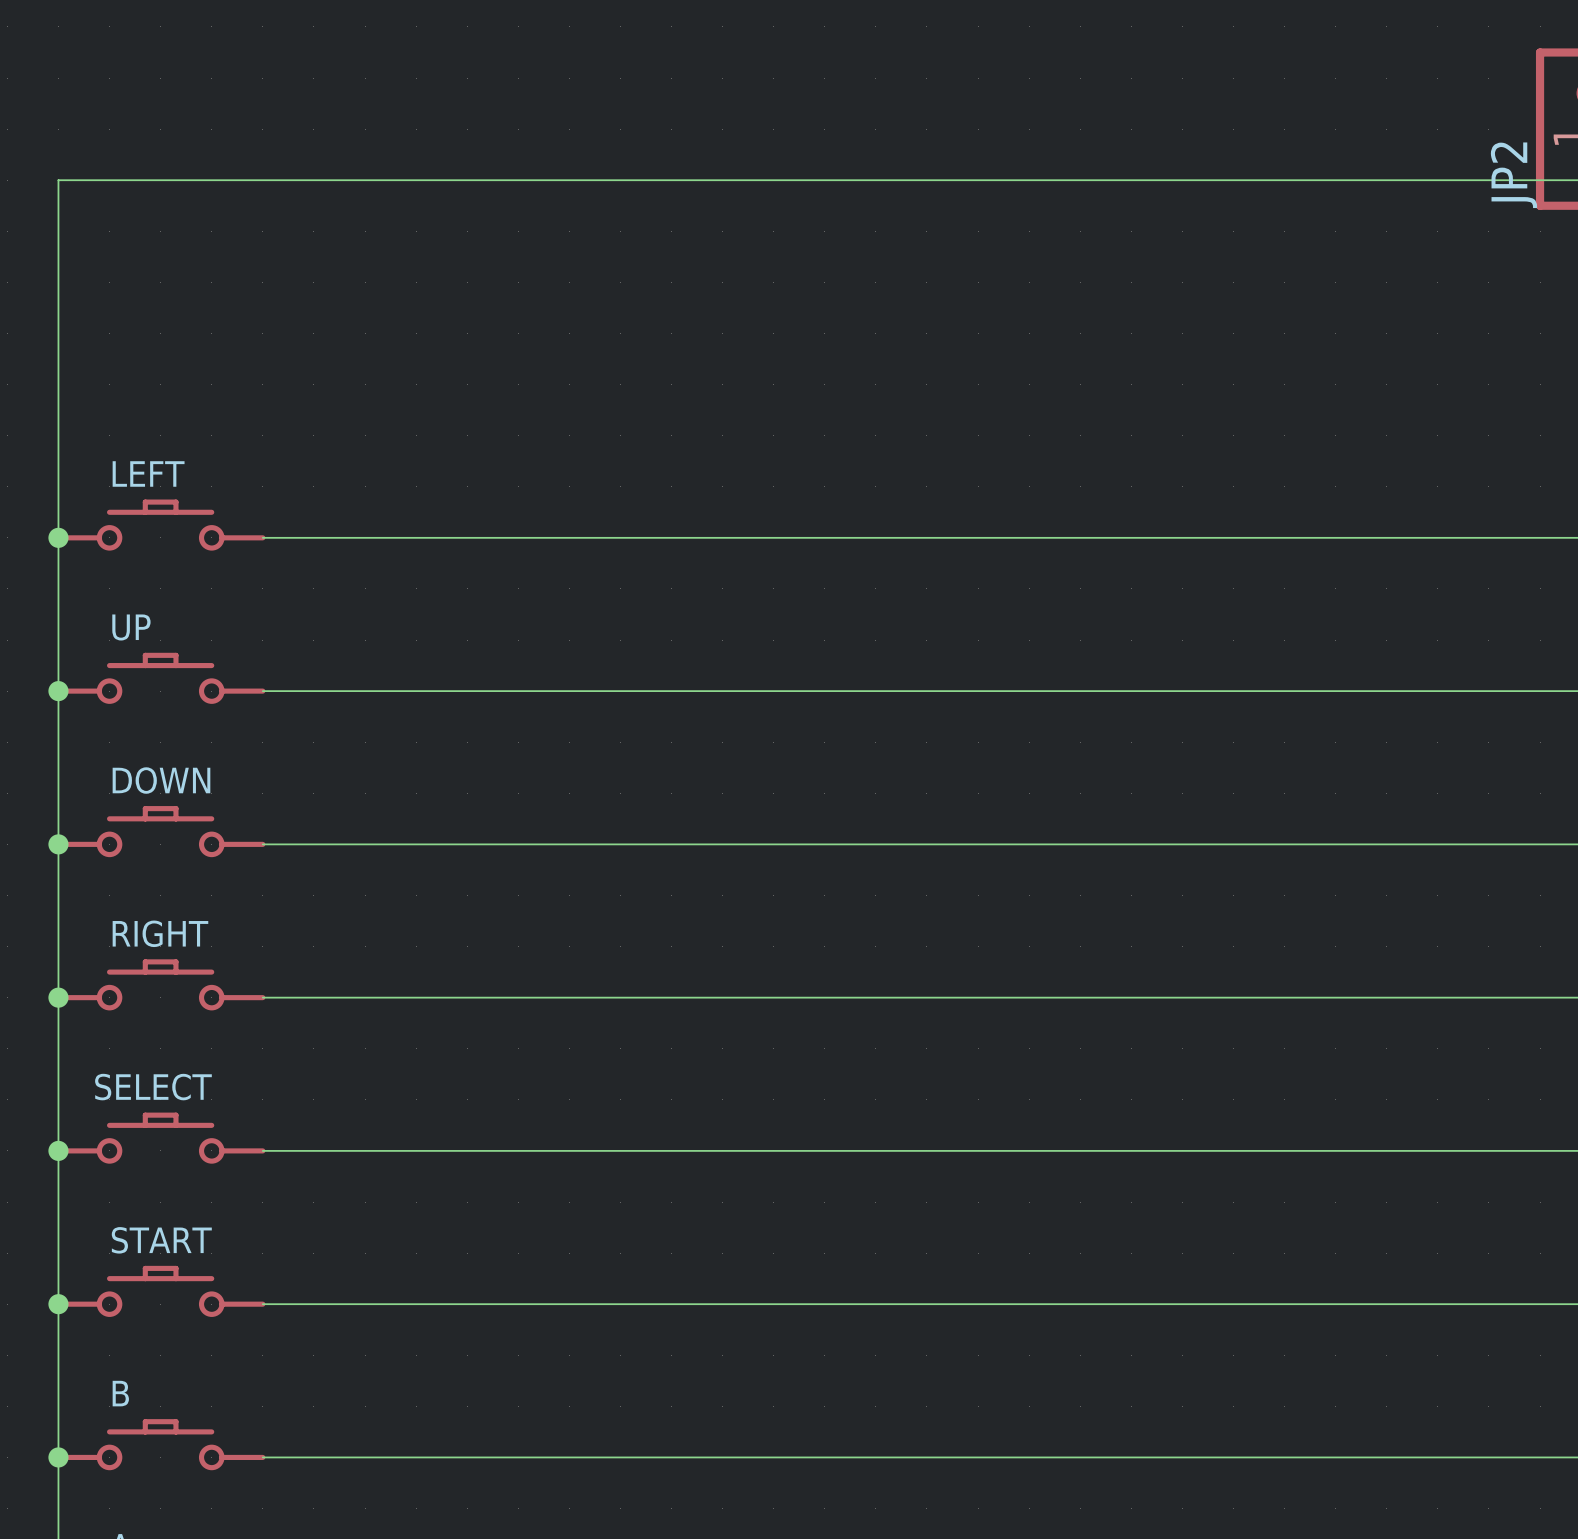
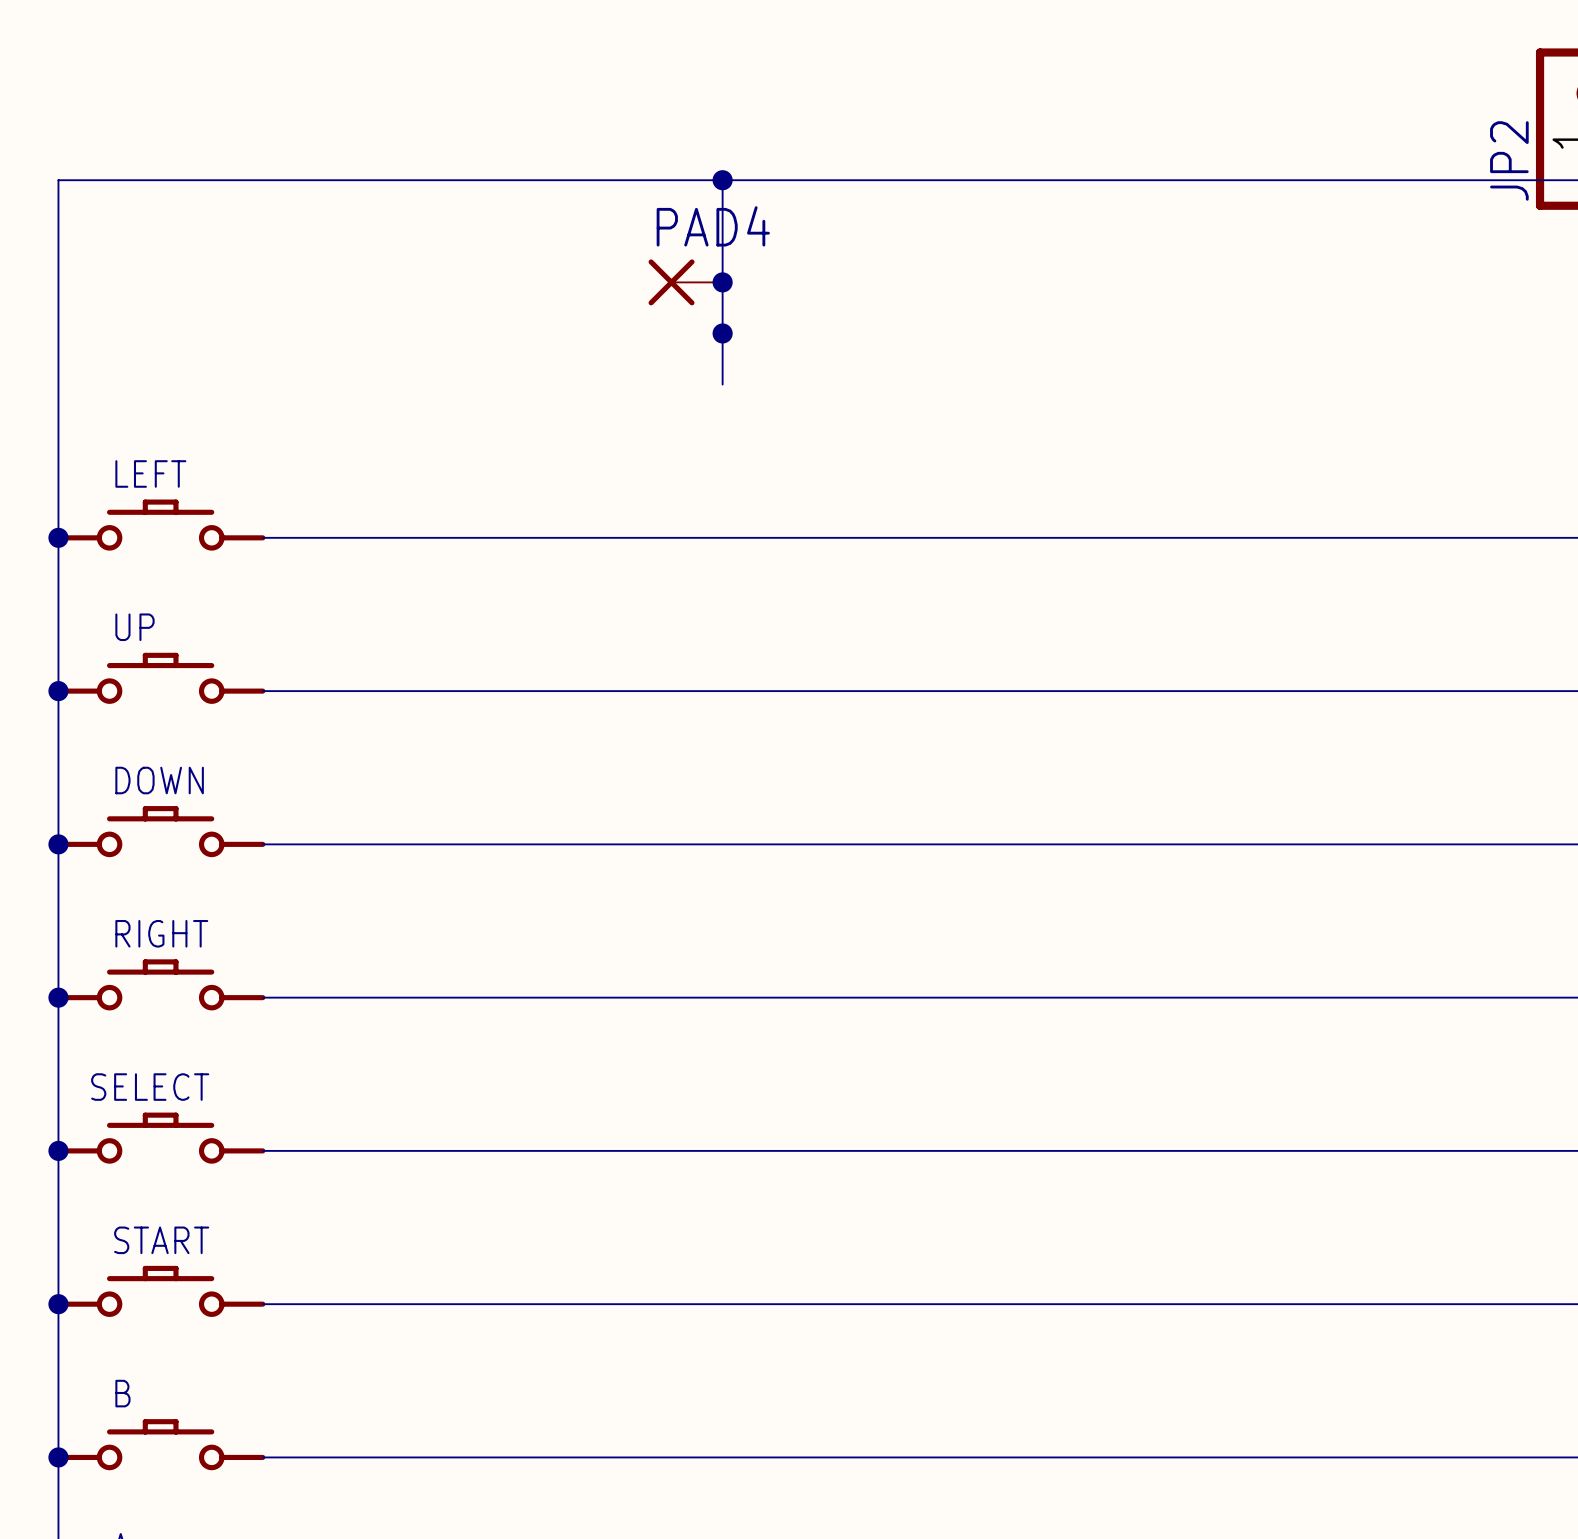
wire: none -> (722, 180) (722, 384)
junction: none -> (722, 180)
PAD4: none -> (685, 282)
junction: none -> (722, 282)
junction: none -> (722, 333)

